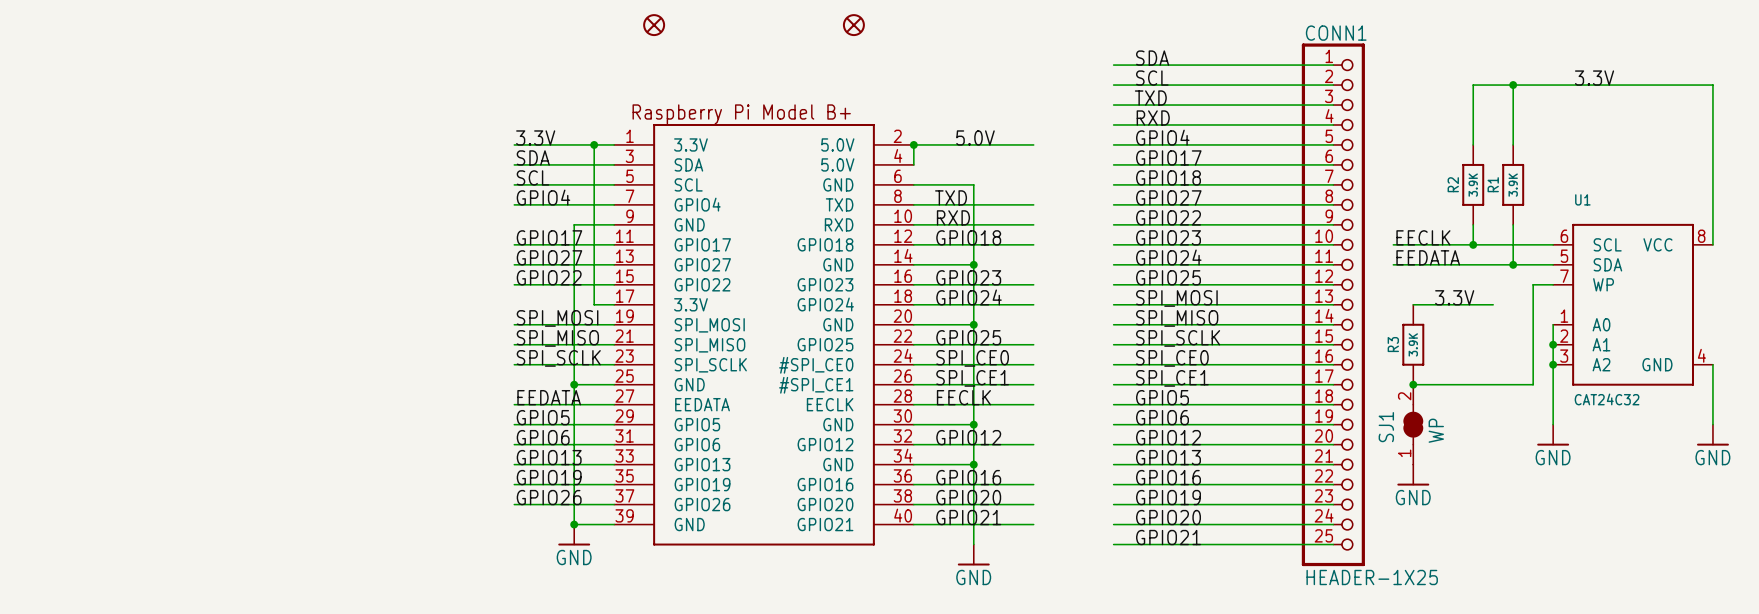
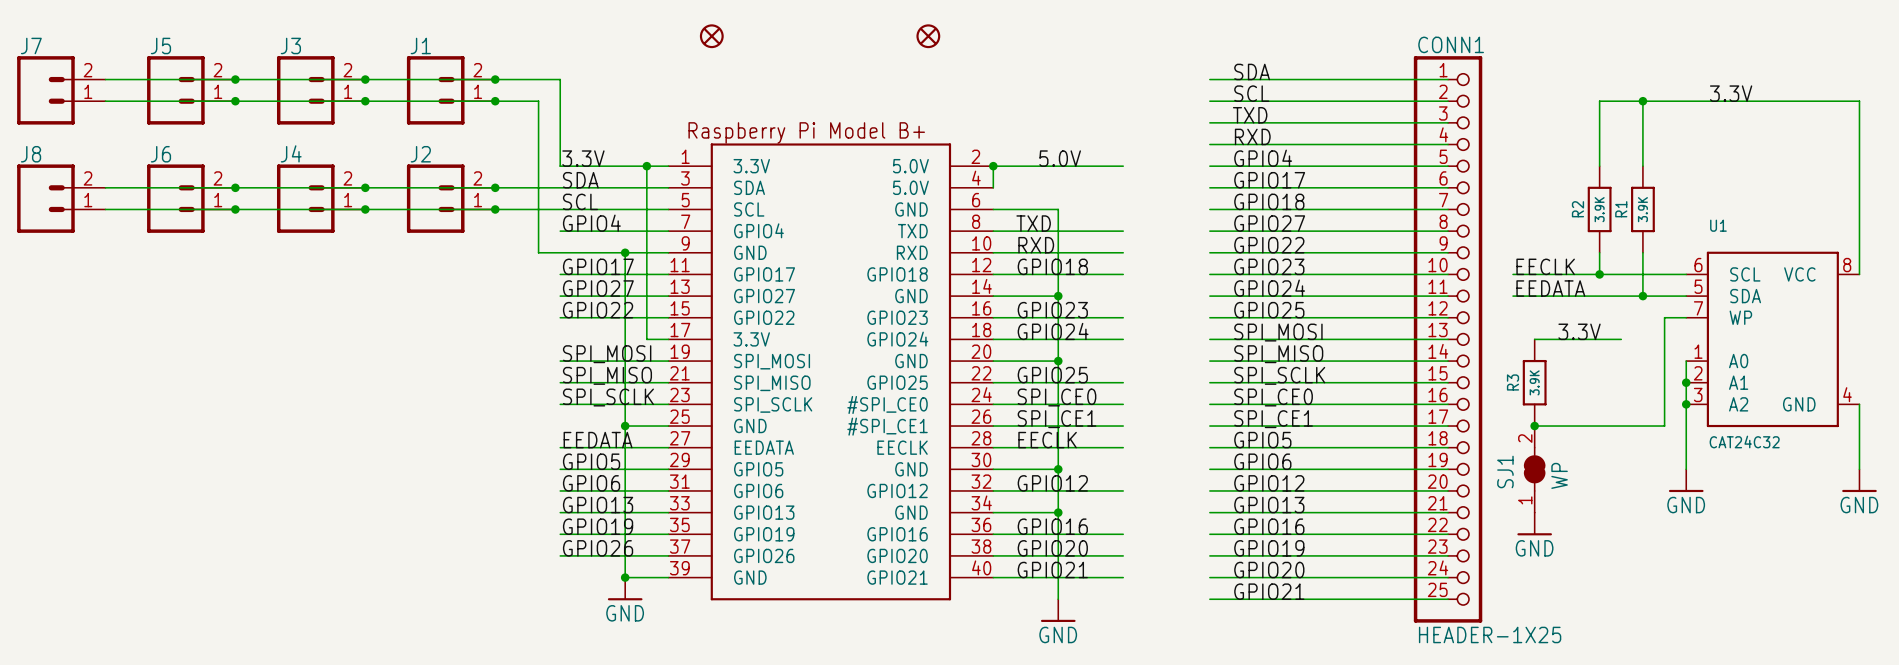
wire: none -> (105, 79) (560, 79) (560, 166)
junction: none -> (235, 79)
junction: none -> (365, 79)
junction: none -> (495, 79)
J7: none -> (61, 90)
J5: none -> (191, 90)
J3: none -> (321, 90)
J1: none -> (451, 90)
wire: none -> (105, 101) (538, 101) (538, 252) (625, 252)
junction: none -> (235, 101)
junction: none -> (365, 101)
junction: none -> (495, 101)
wire: none -> (105, 187) (560, 187)
junction: none -> (235, 187)
junction: none -> (365, 187)
junction: none -> (495, 187)
J8: none -> (61, 198)
J6: none -> (191, 198)
J4: none -> (321, 198)
J2: none -> (451, 198)
wire: none -> (105, 209) (560, 209)
junction: none -> (235, 209)
junction: none -> (365, 209)
junction: none -> (495, 209)
junction: none -> (625, 252)

